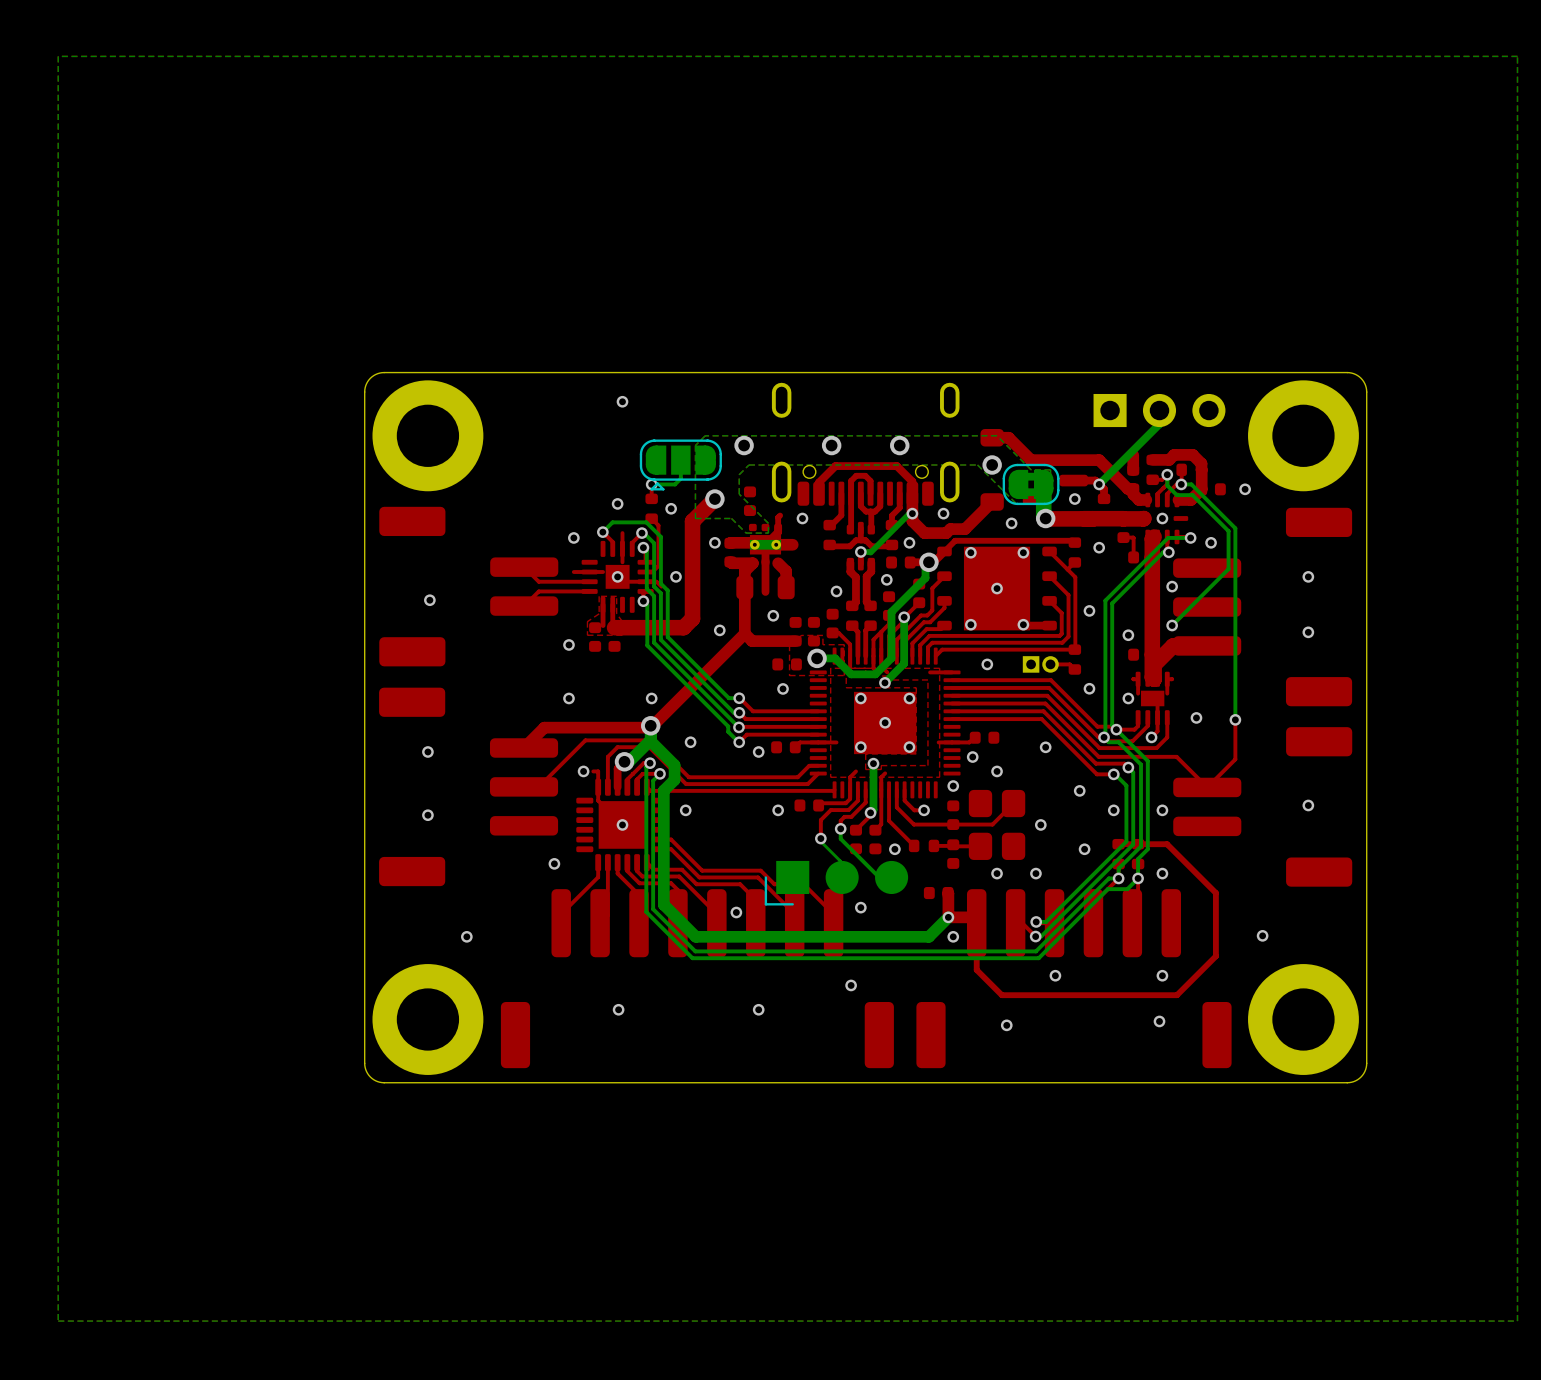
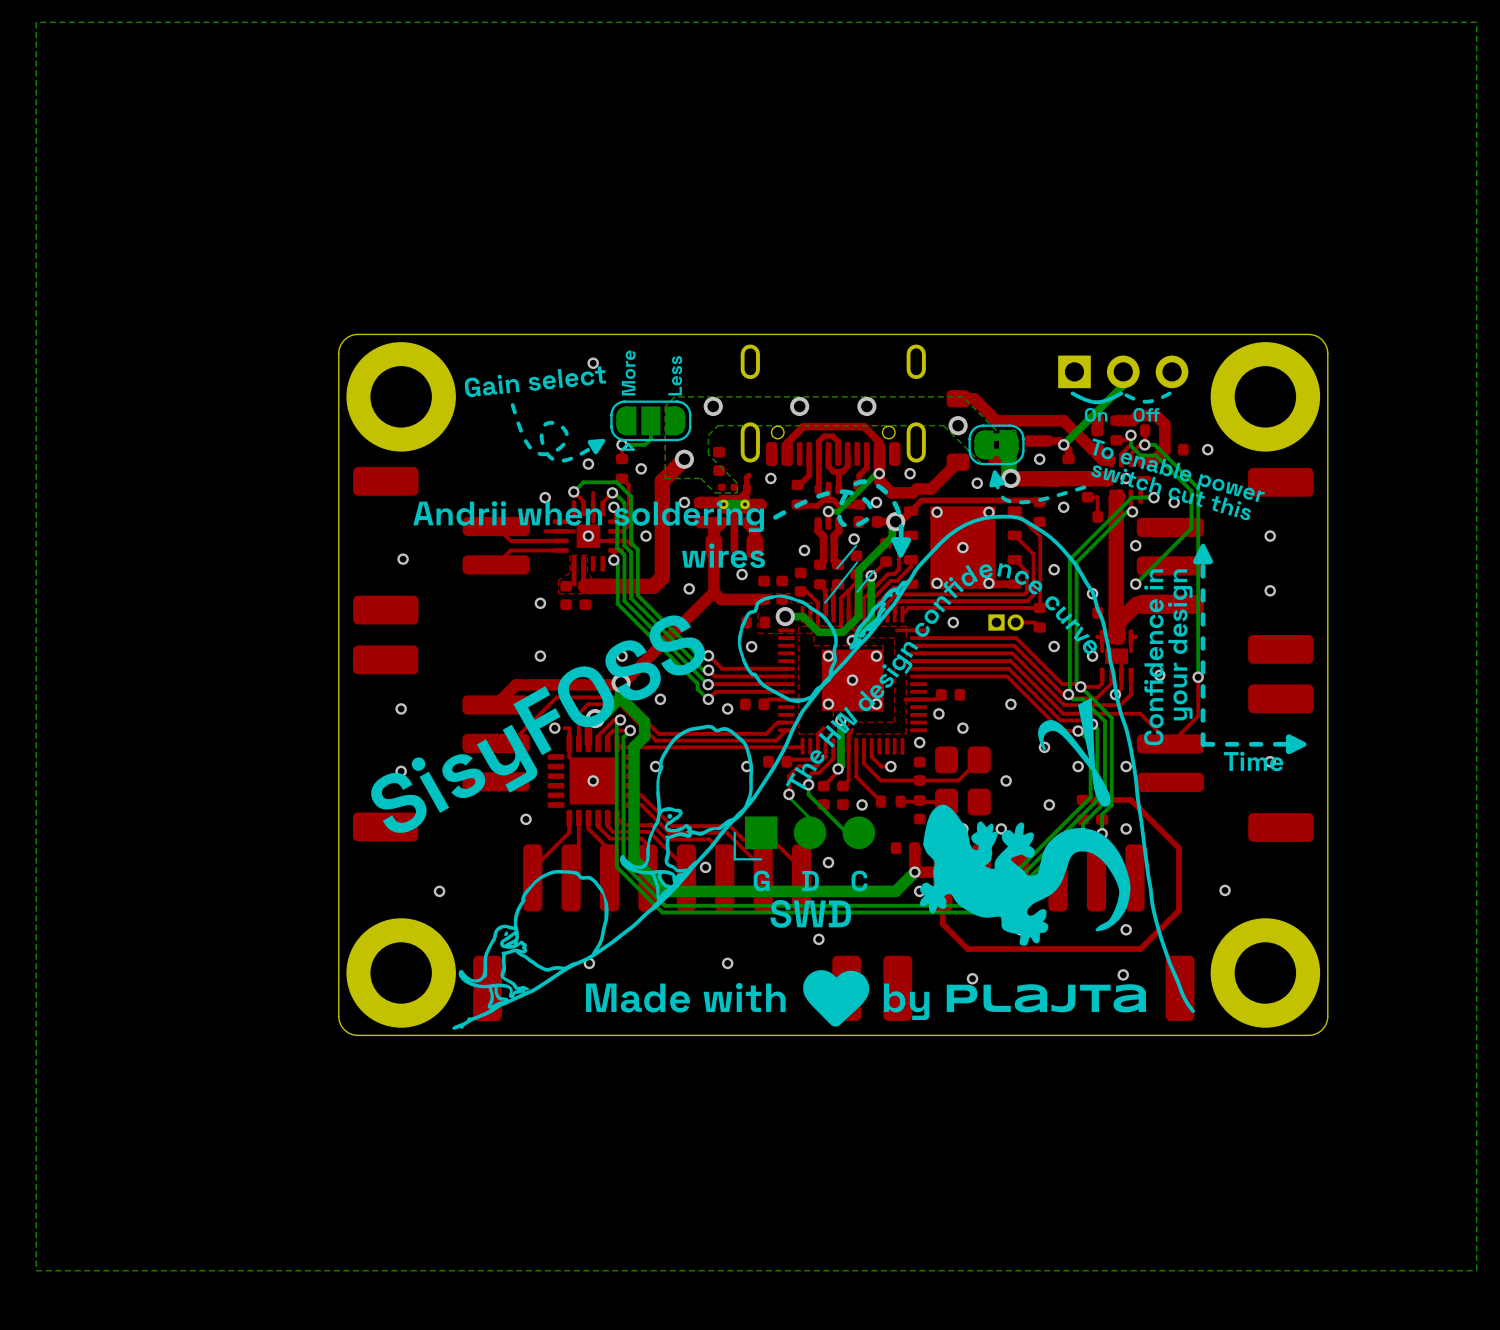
drawing: none -> [464, 350, 636, 463]
drawing: none -> [668, 355, 683, 396]
drawing: none -> [371, 391, 1307, 1030]

